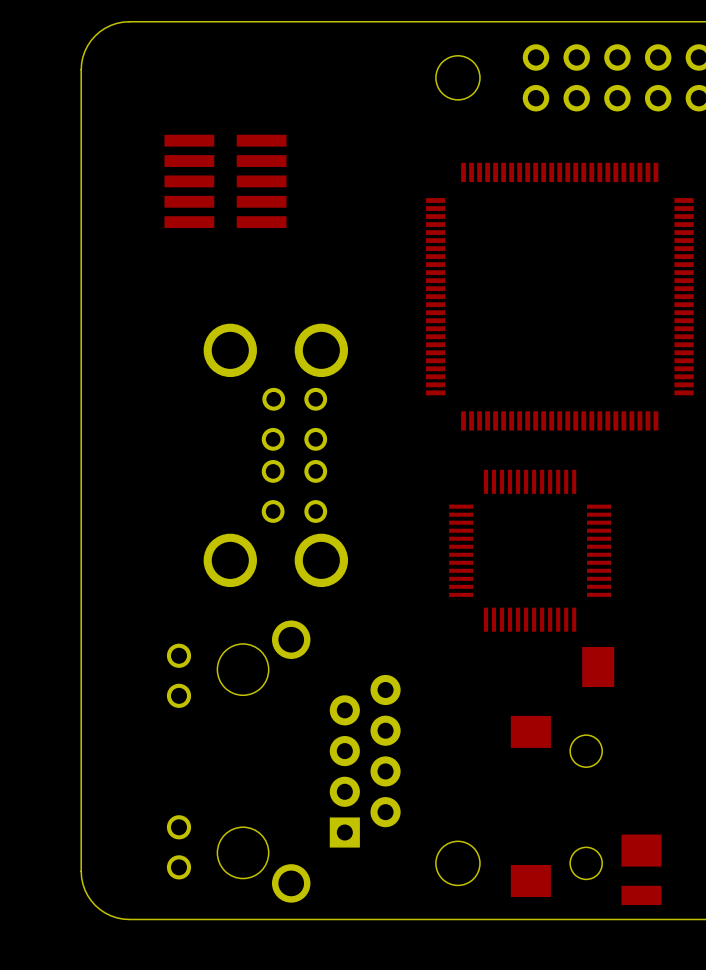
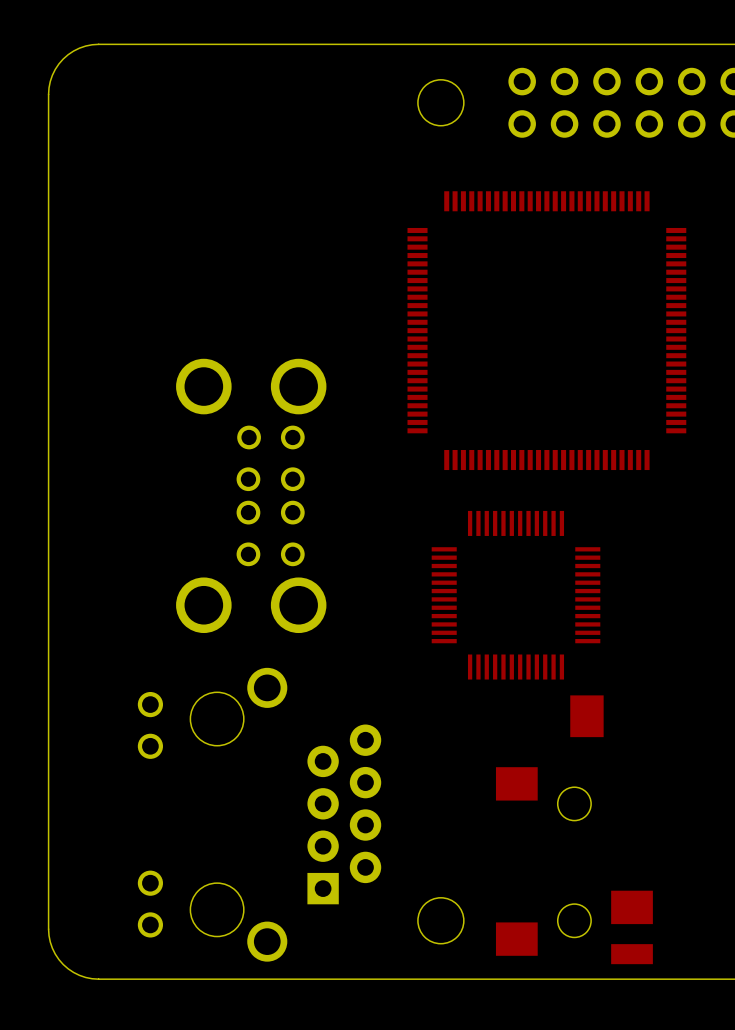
part: (225, 181) -> none

